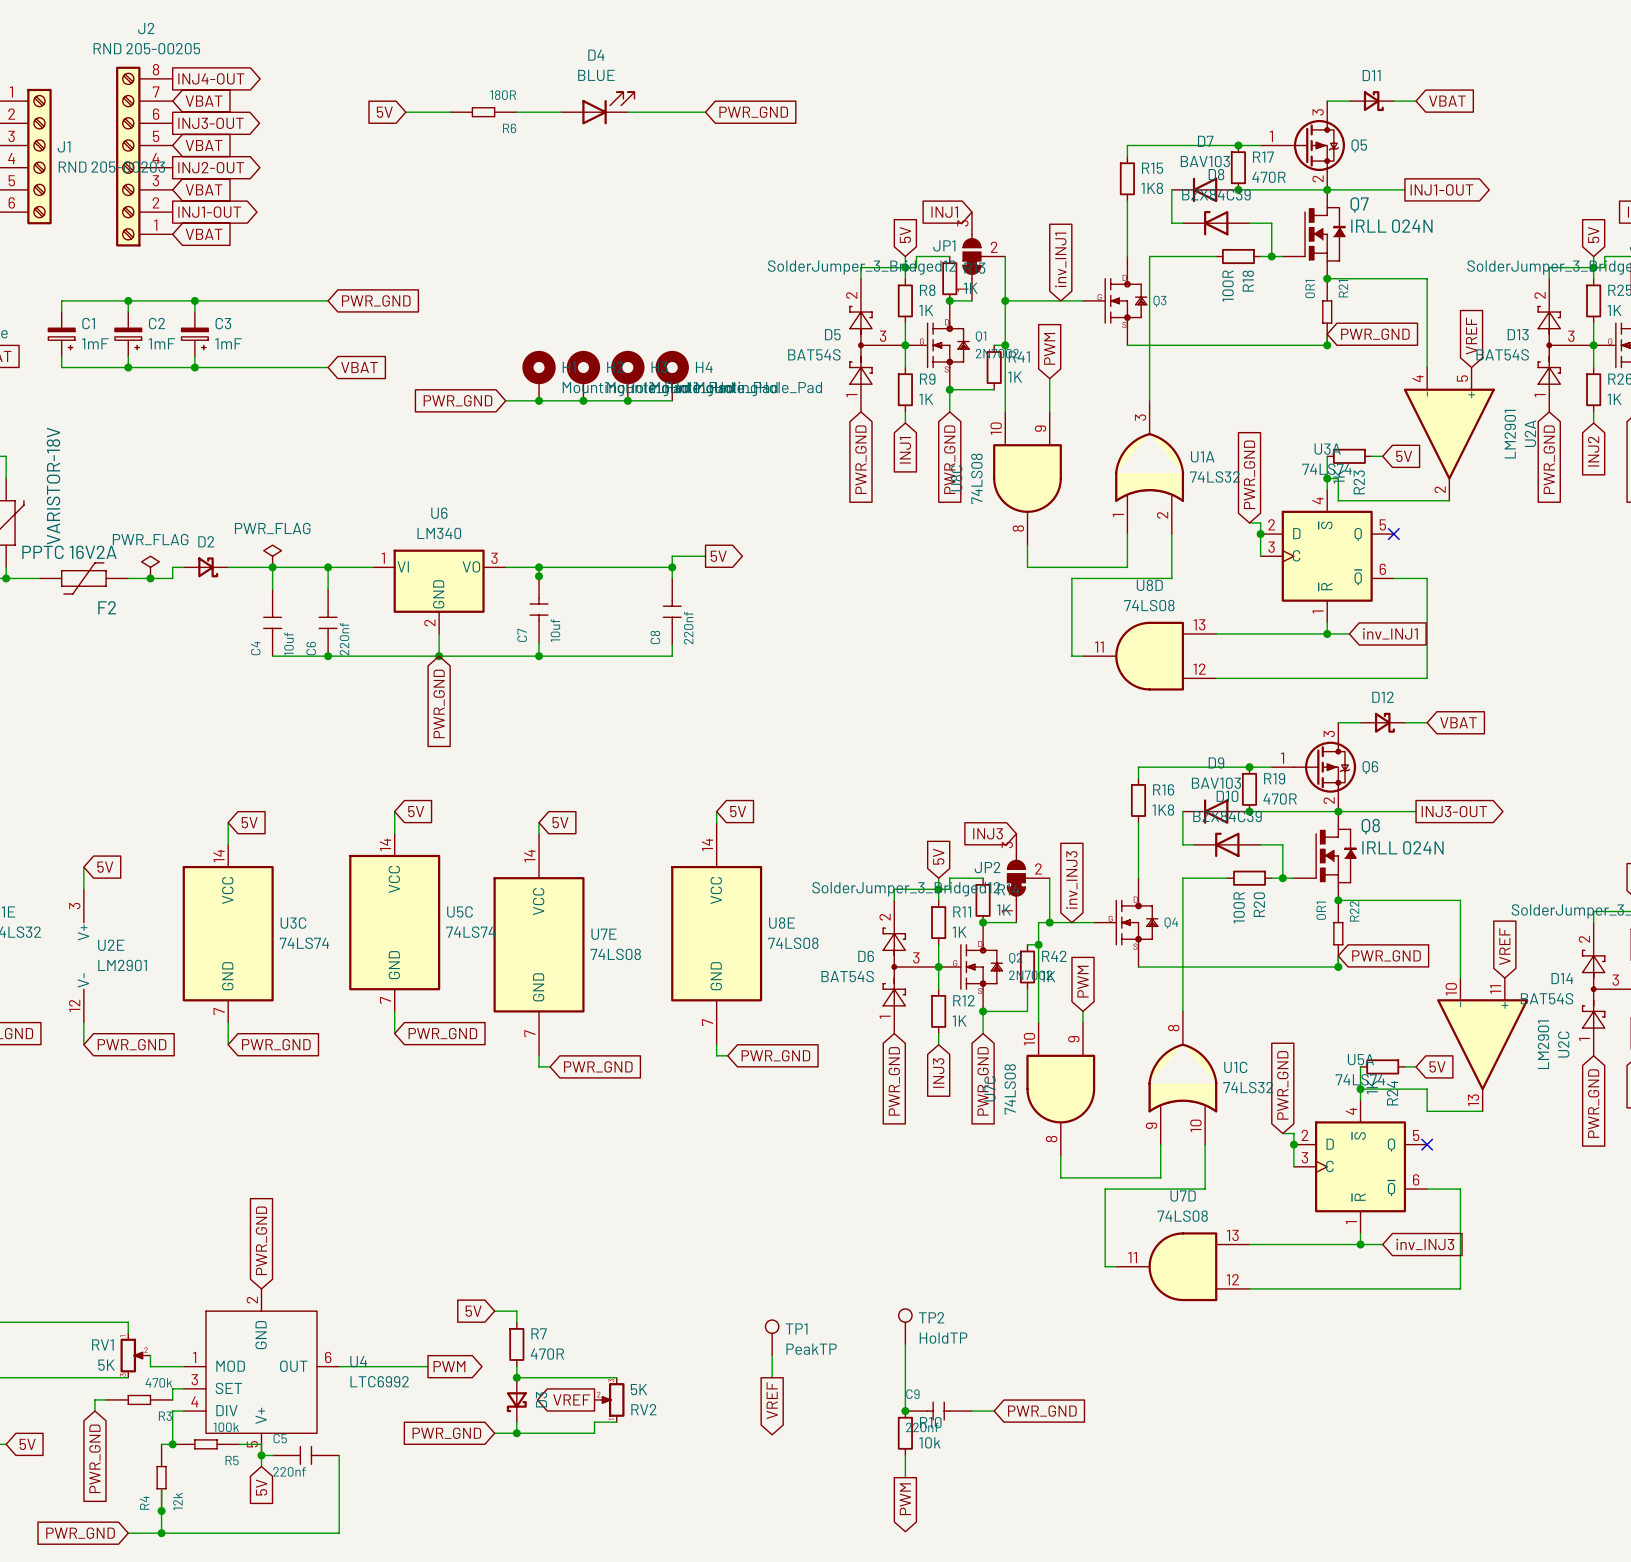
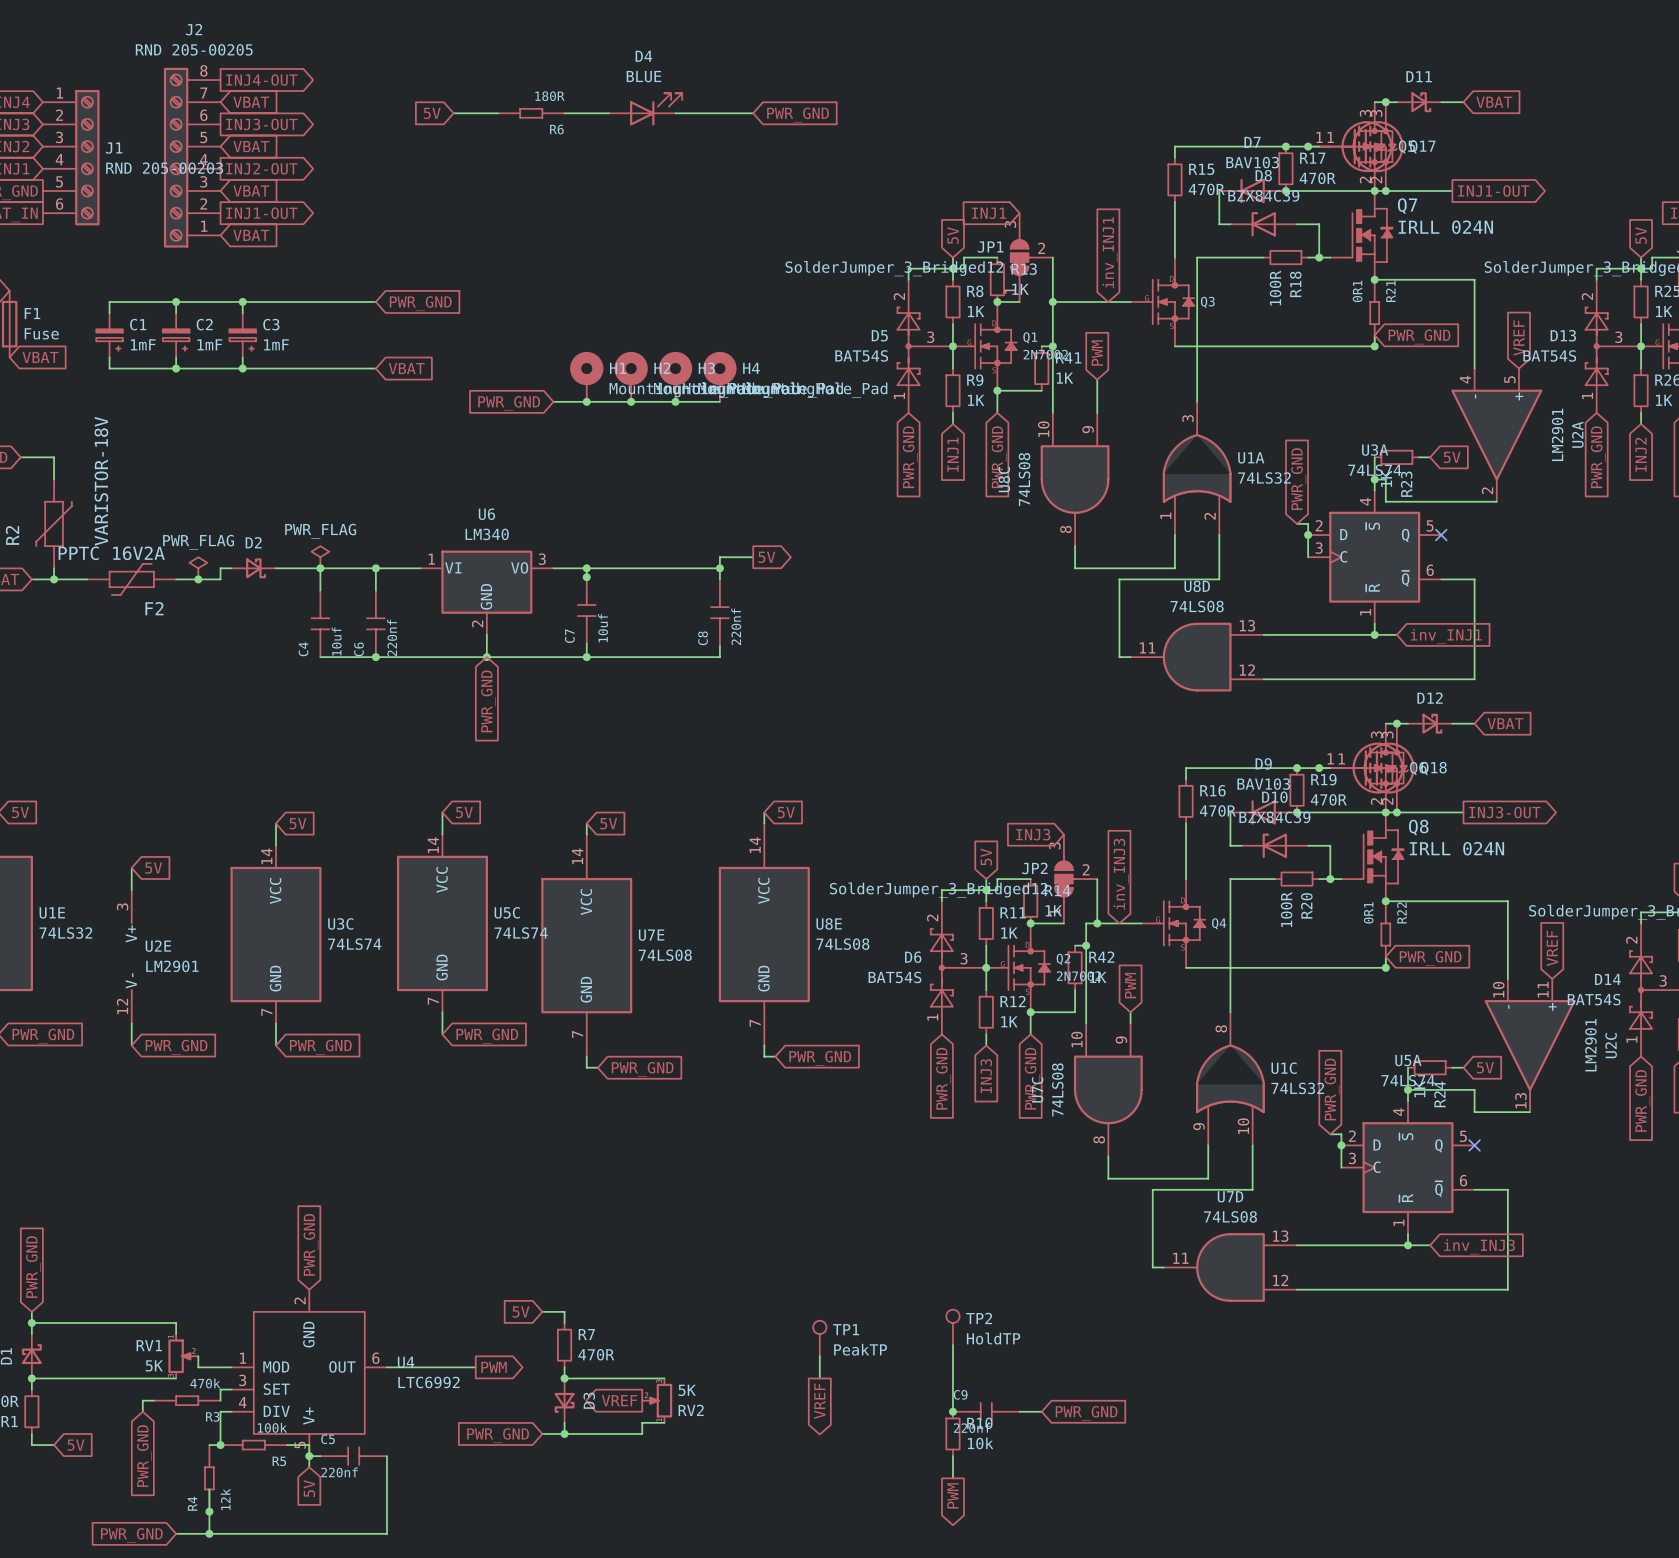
junction: none -> (1385, 102)
junction: none -> (1308, 146)
Q17: none -> (1361, 146)
R15 value: 1K8 (1152, 188) -> 470R (1206, 189)
junction: none -> (1385, 190)
junction: none -> (1396, 723)
junction: none -> (1319, 768)
Q18: none -> (1372, 768)
R16 value: 1K8 (1163, 810) -> 470R (1217, 810)
junction: none -> (1396, 812)

